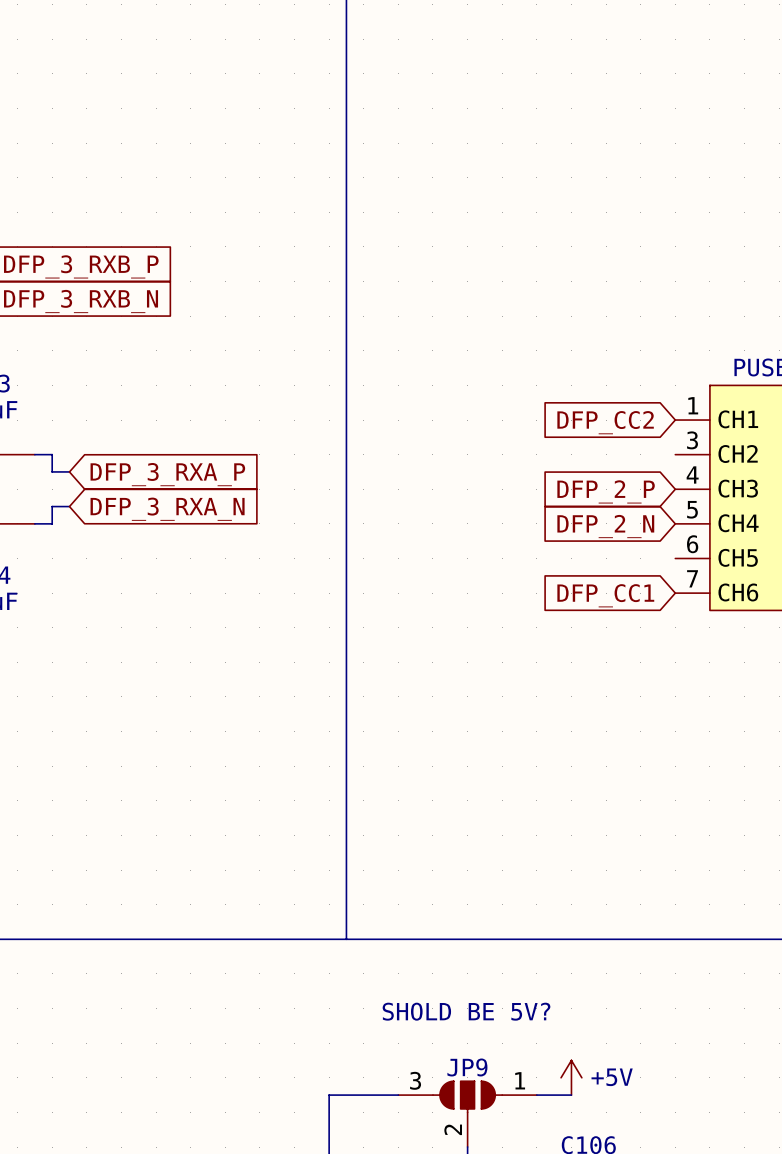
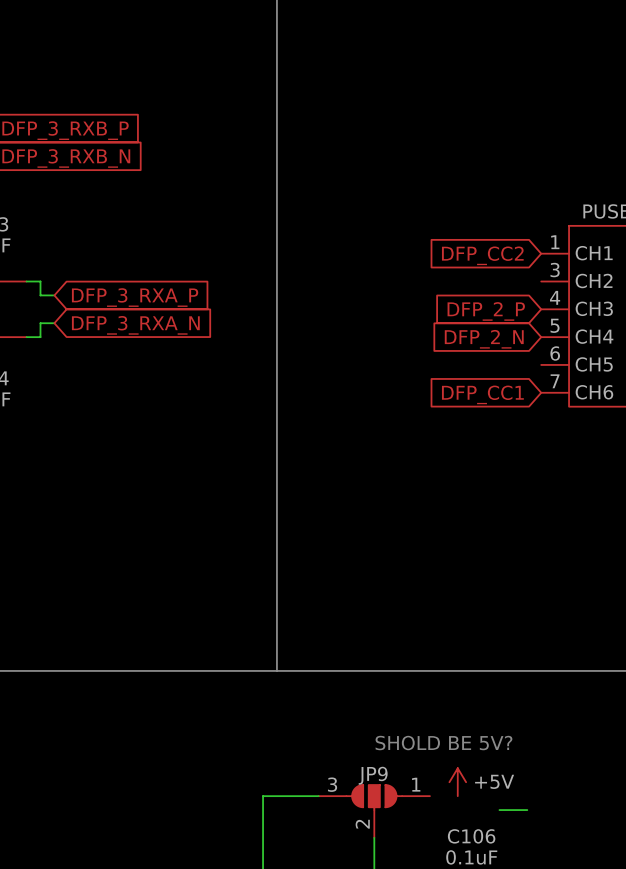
text position: SHOLD BE 5V? (466, 1011) -> SHOLD BE 5V? (443, 743)
wire: (536, 1095) (571, 1095) -> (499, 810) (527, 810)

